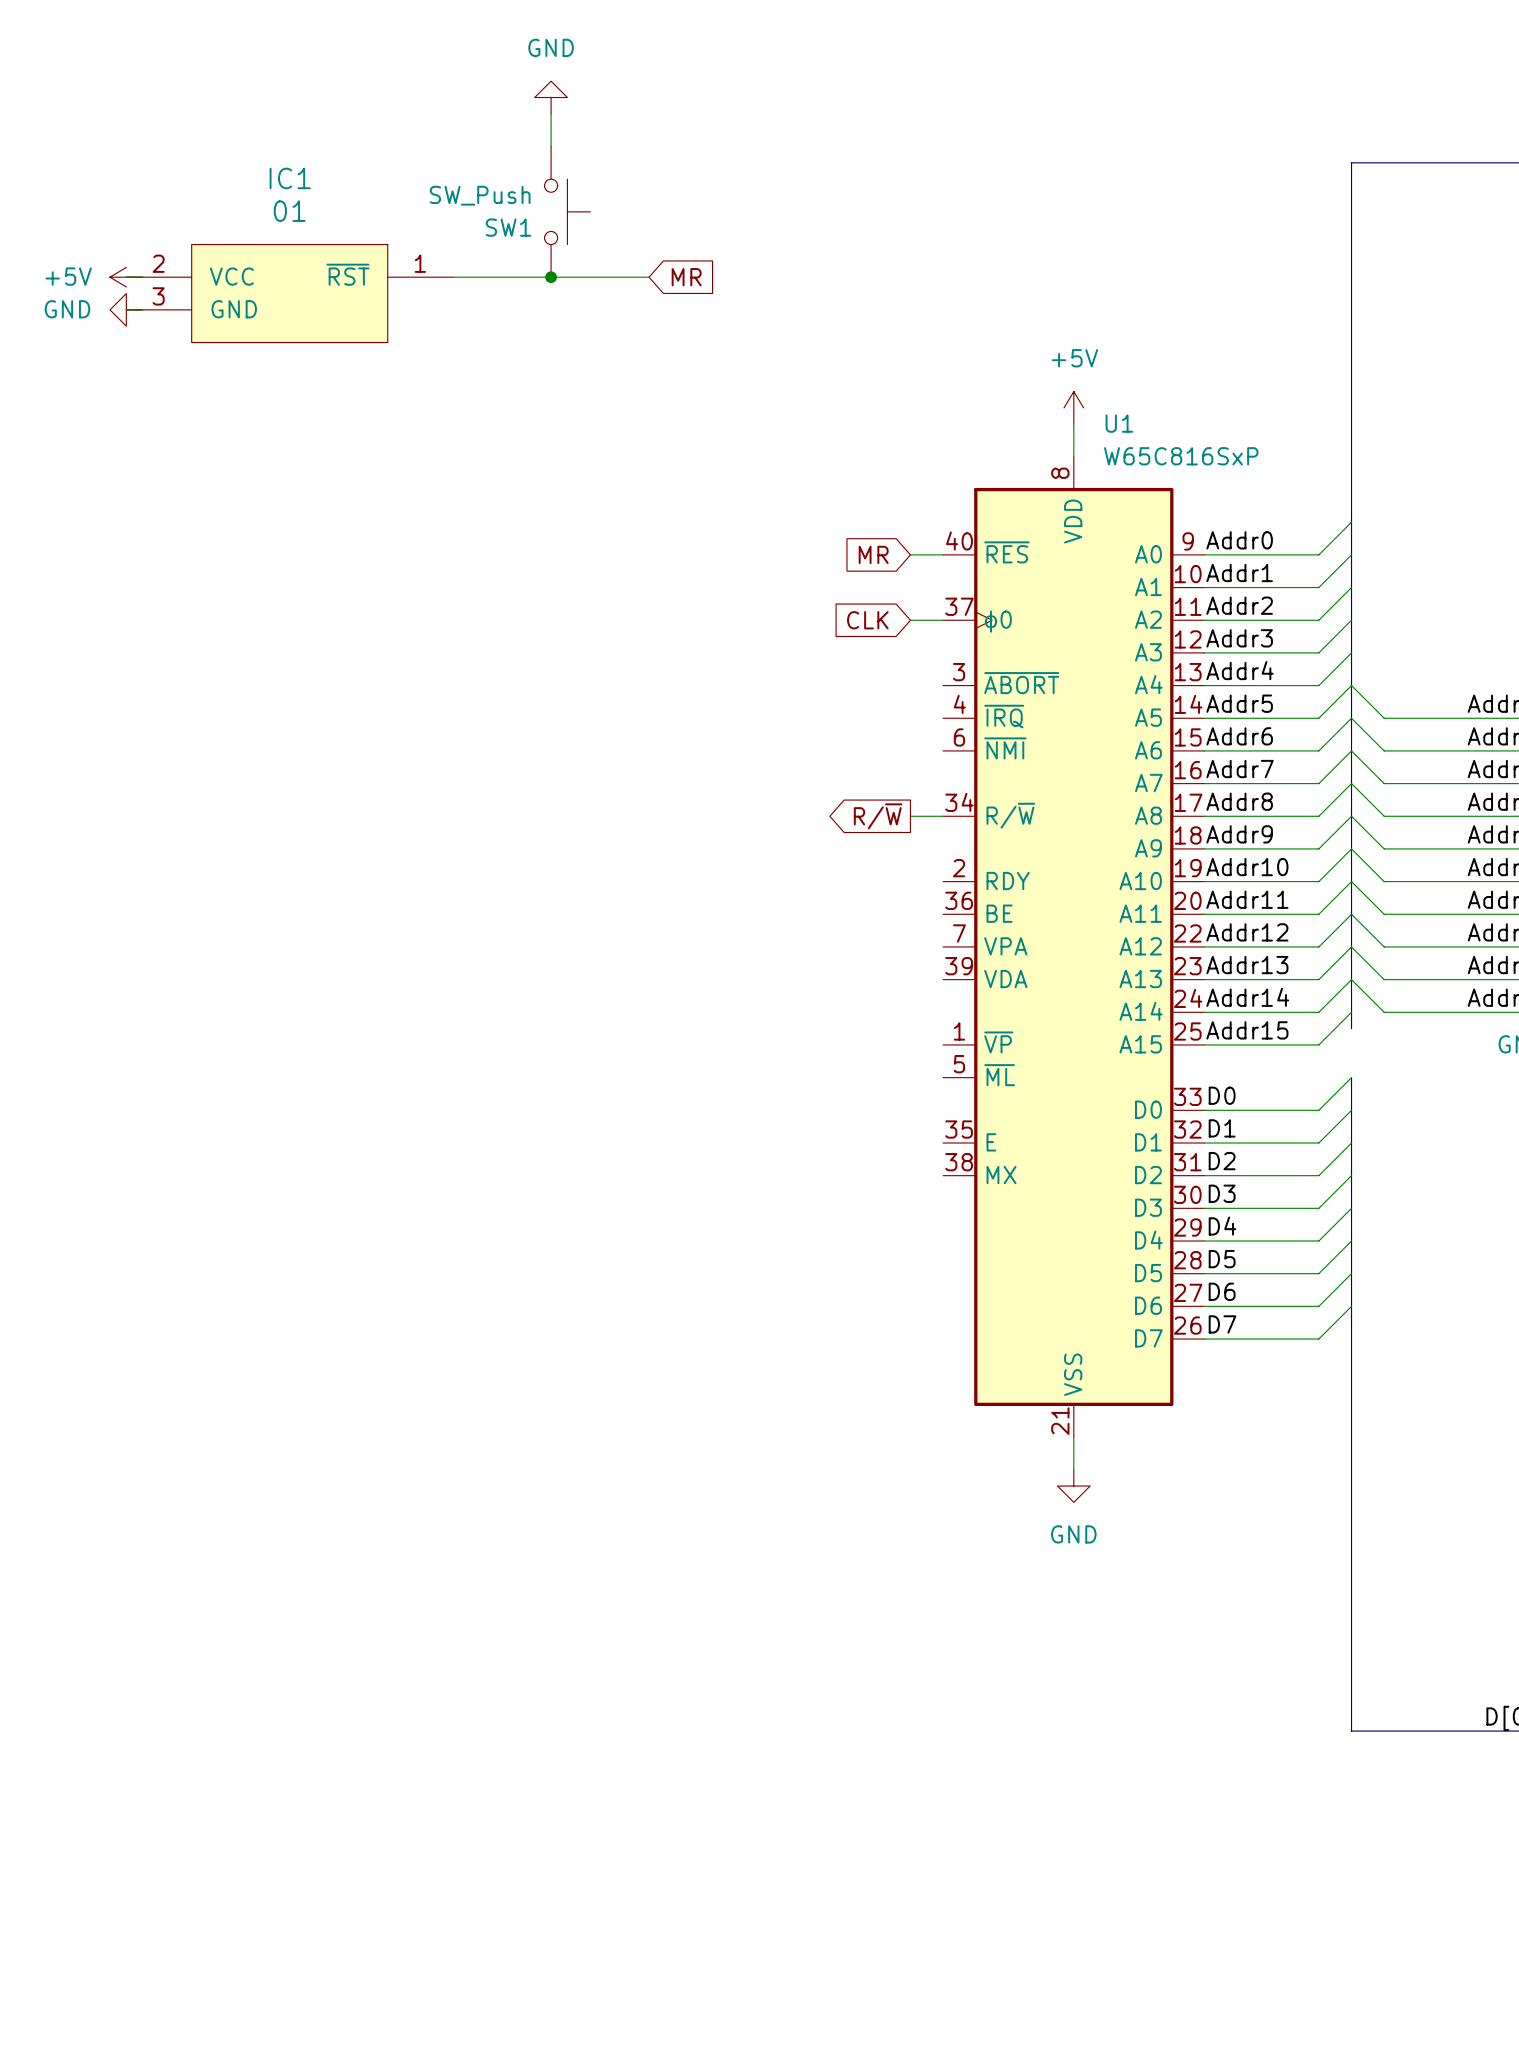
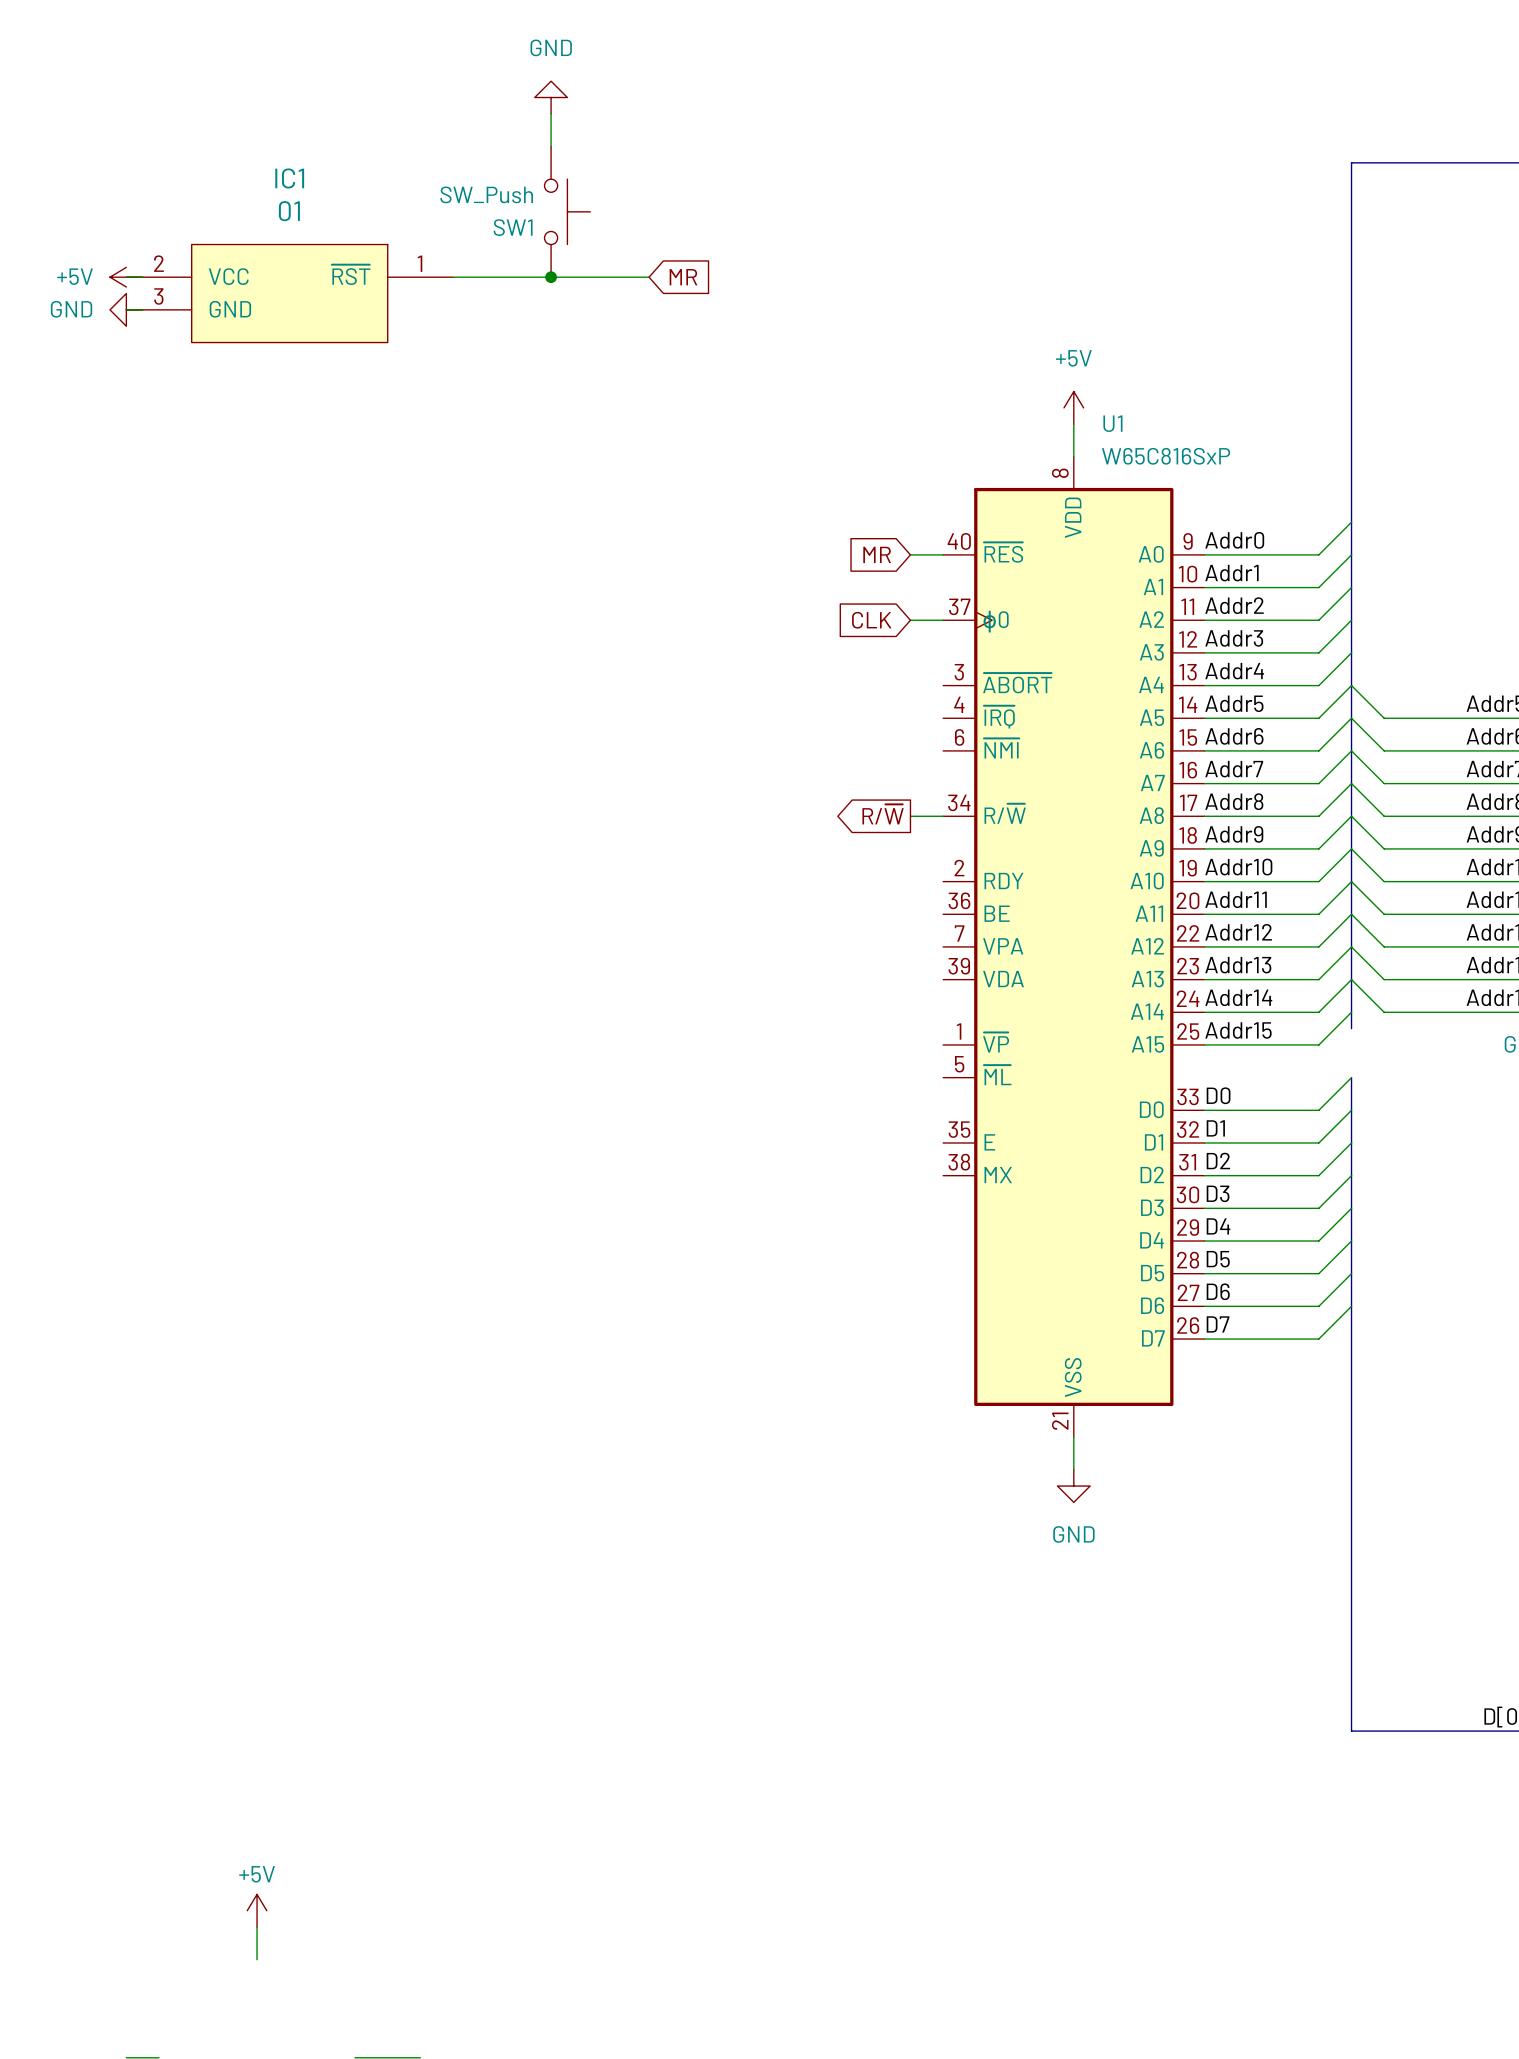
power symbol: none -> +5V (257, 1910)
wire: none -> (257, 1927) (257, 1959)
wire: none -> (126, 2057) (159, 2057)
wire: none -> (355, 2057) (420, 2057)

